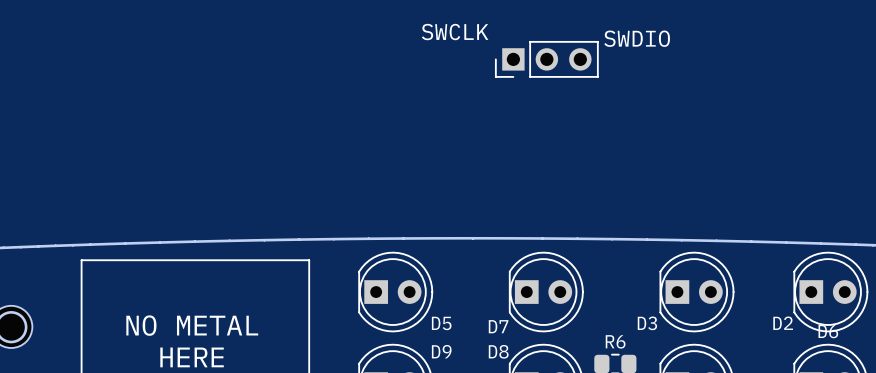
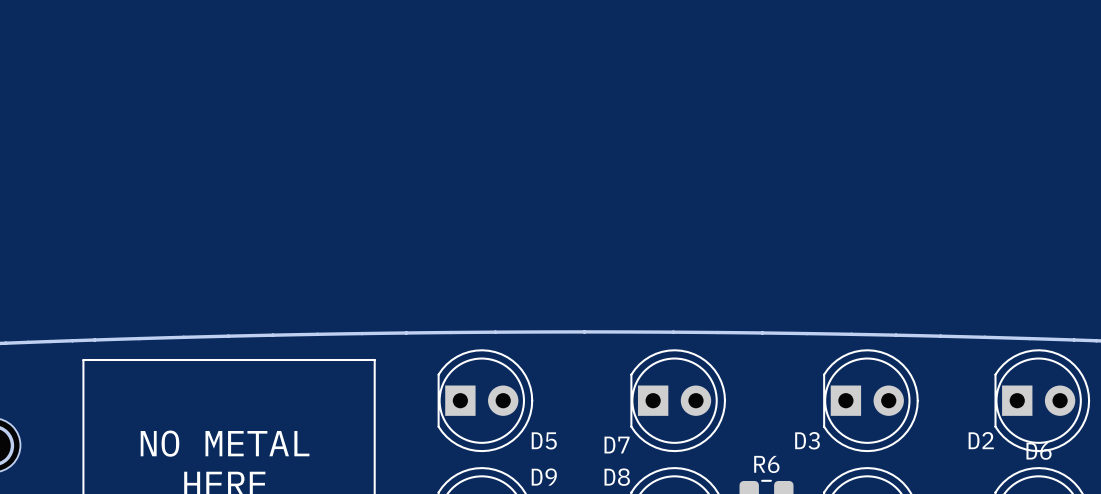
text: SWCLK (455, 32) -> none
text: SWDIO (637, 38) -> none
part: (546, 59) -> none

